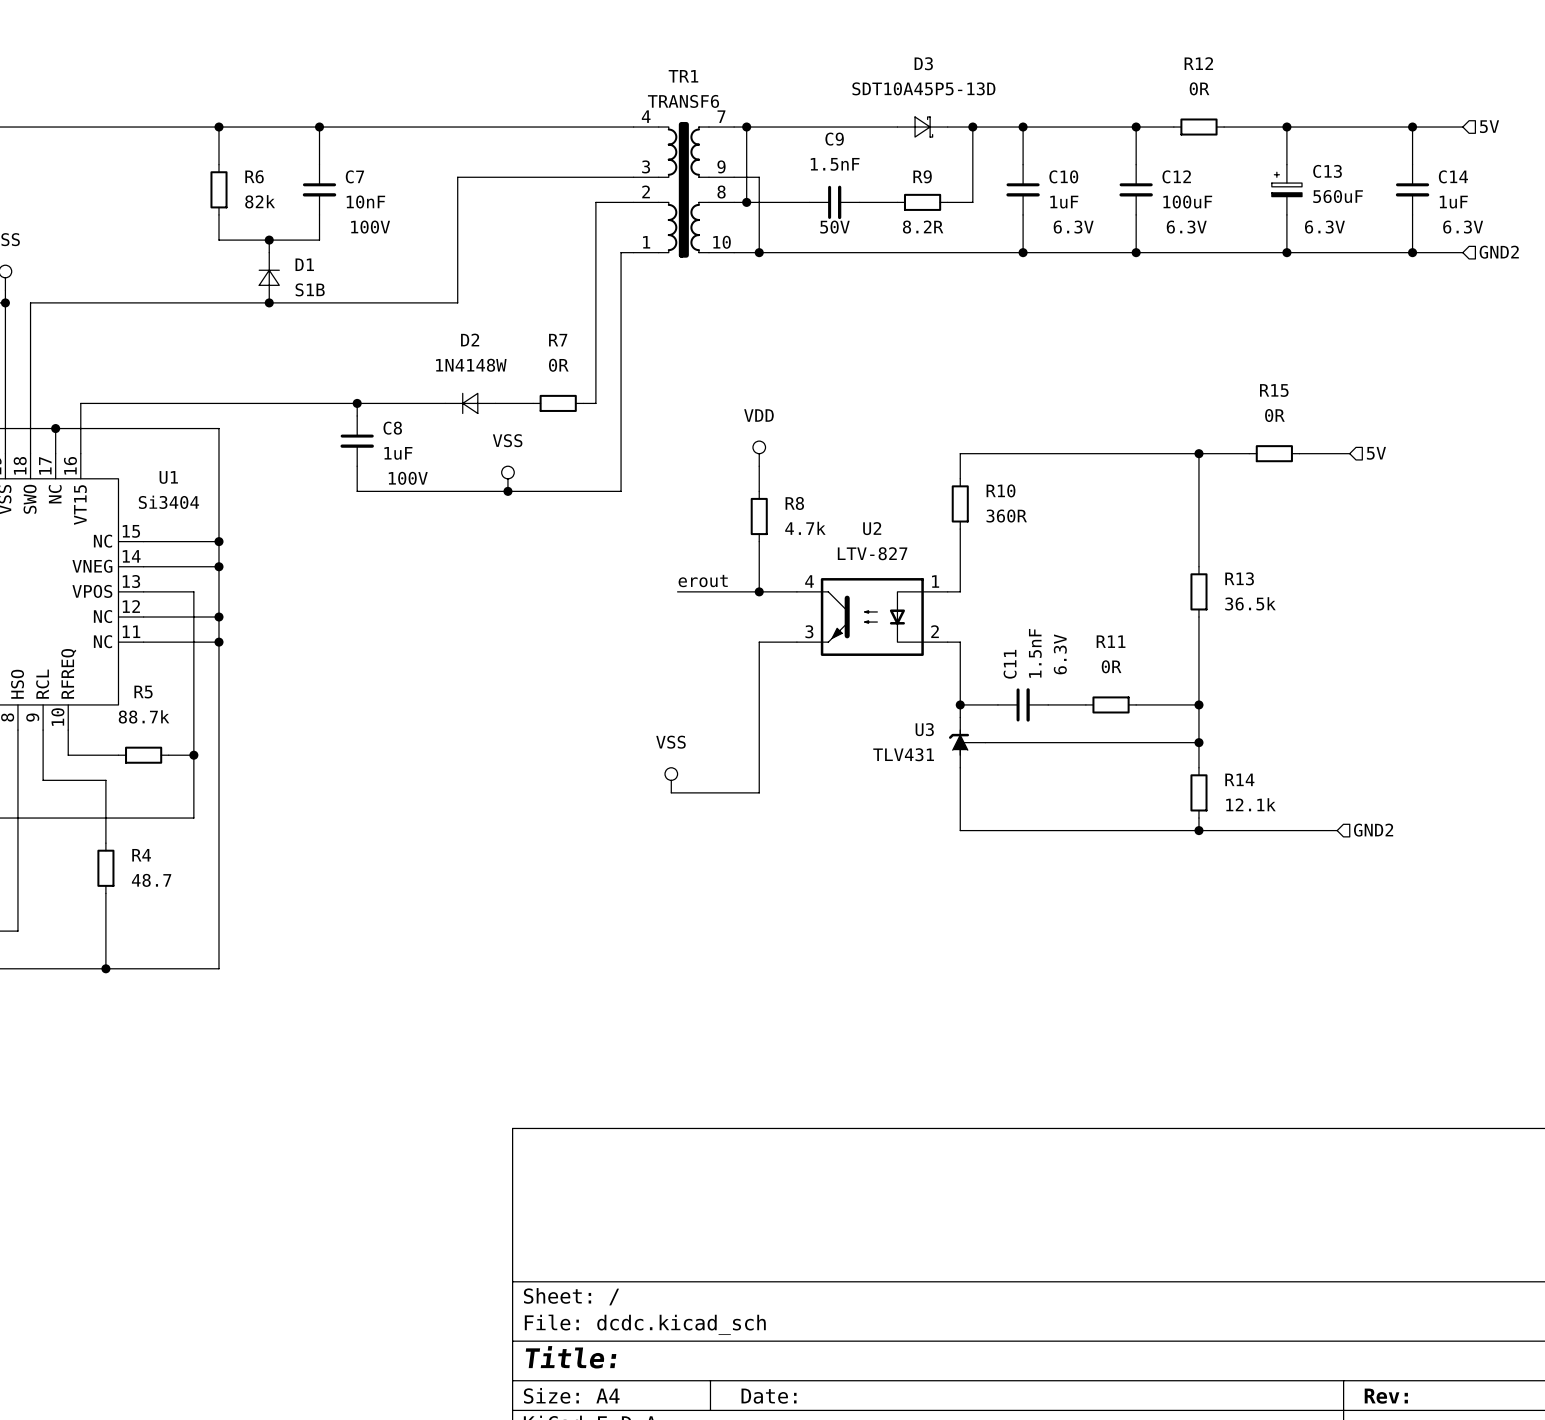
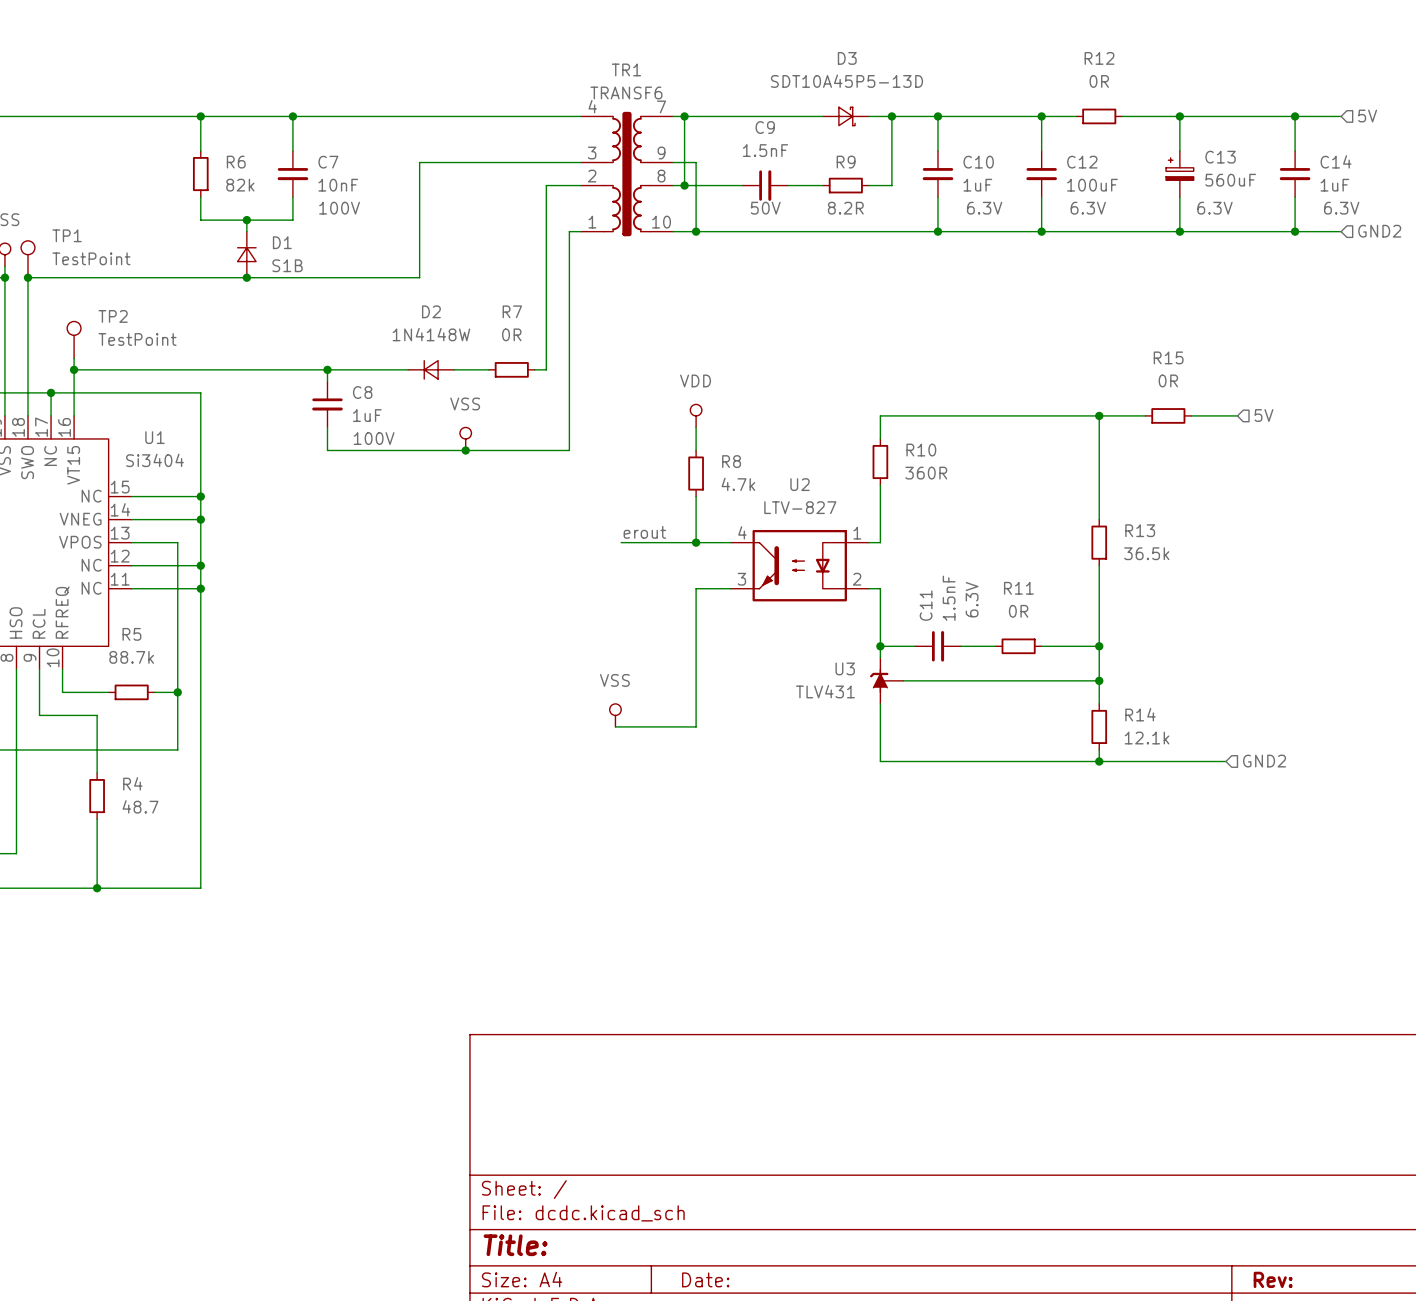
TP1: none -> TestPoint (28, 259)
junction: none -> (28, 277)
TP2: none -> TestPoint (74, 339)
wire: none -> (74, 358) (74, 369)
junction: none -> (74, 369)

